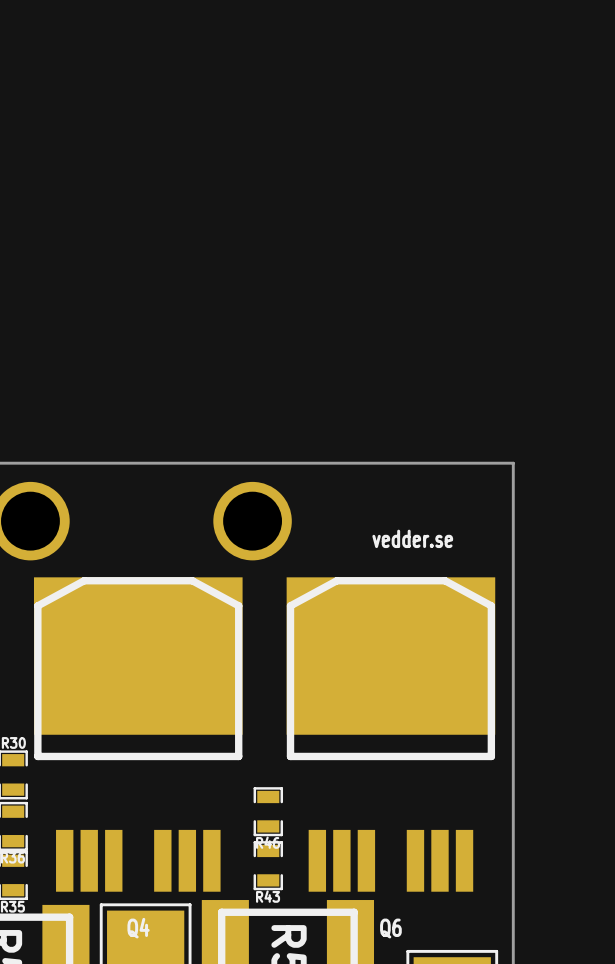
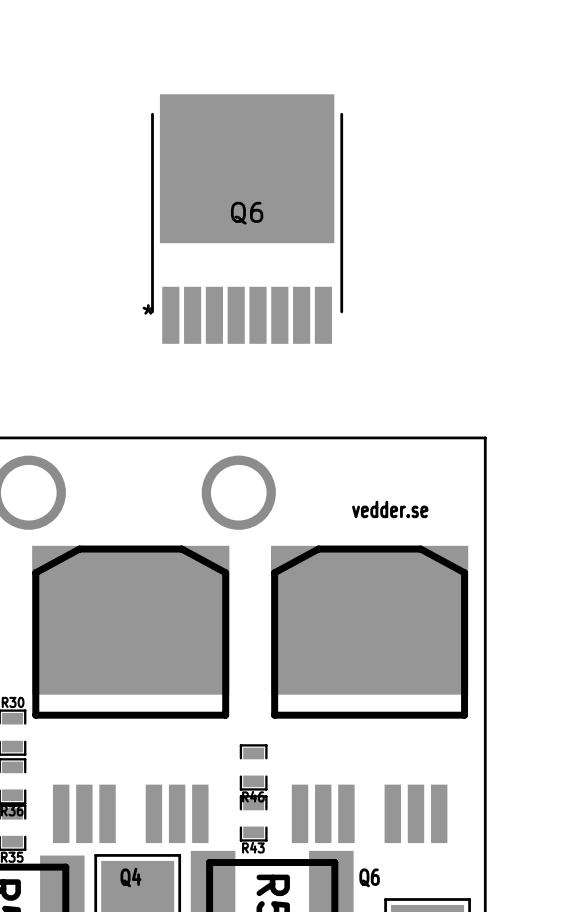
Q6: none -> (247, 219)

